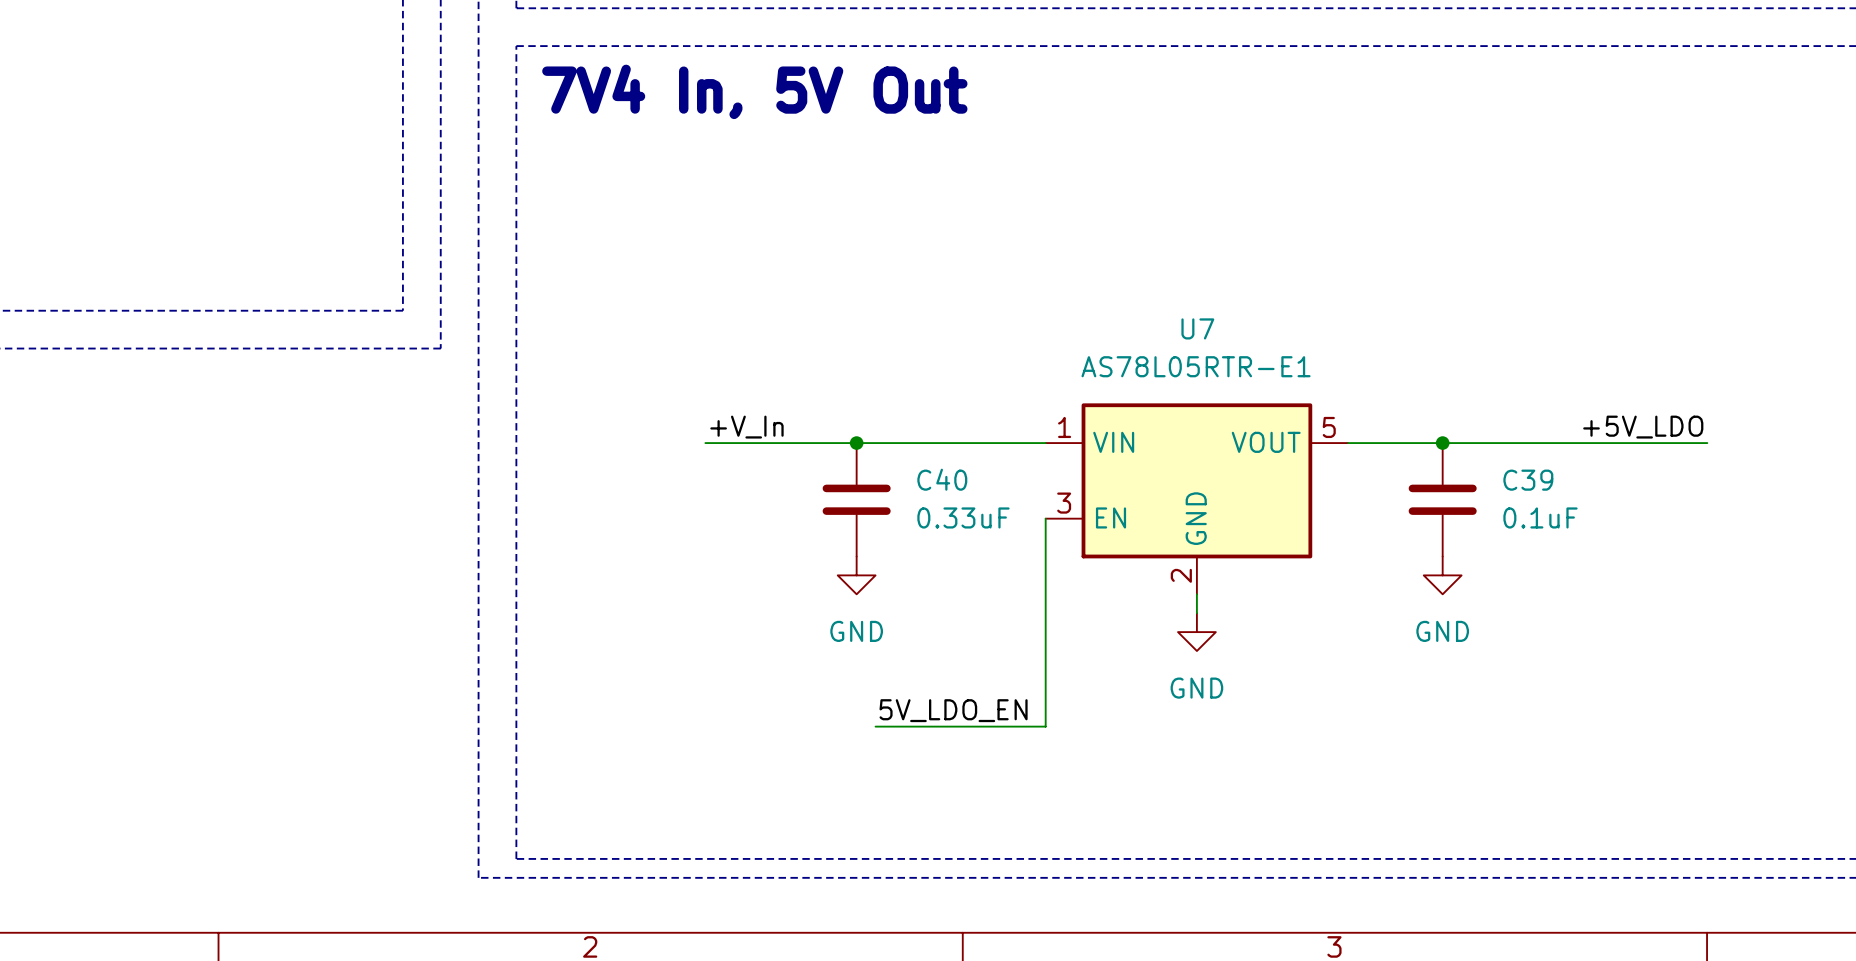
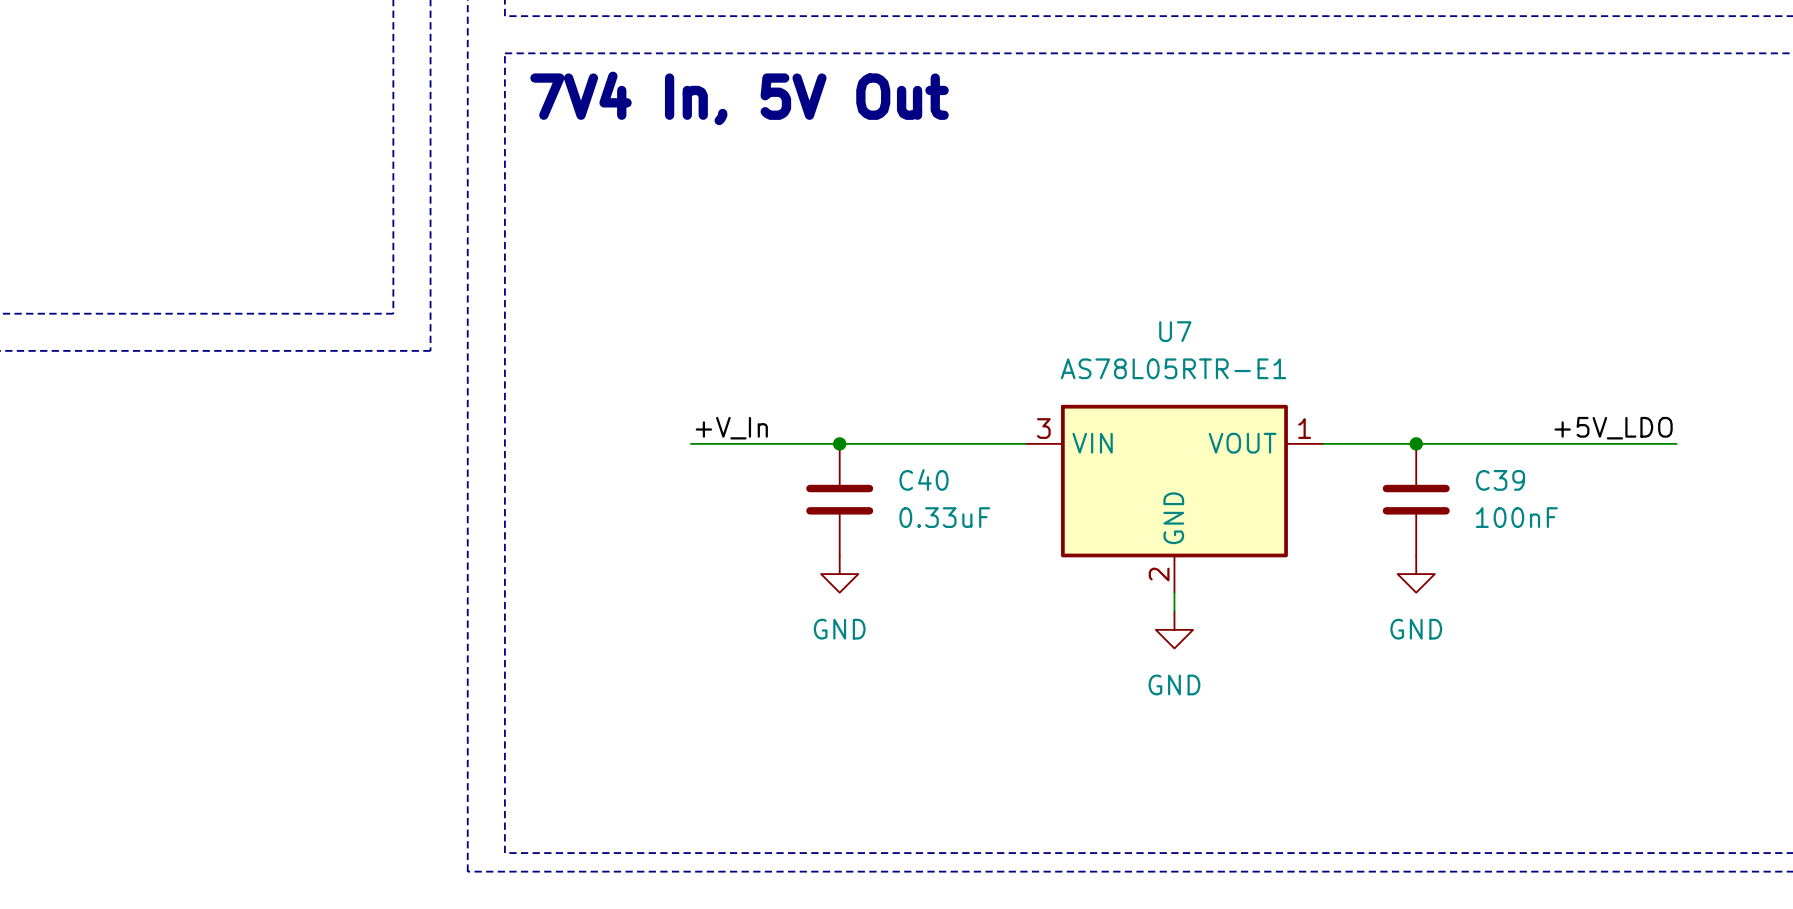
U7 symbol: [1045, 403, 1349, 595] -> [1025, 404, 1324, 593]
C39 value: 0.1uF (1540, 517) -> 100nF (1516, 517)
wire: (1045, 518) (1045, 726) (875, 726) -> none
label: 5V_LDO_EN (953, 710) -> none

